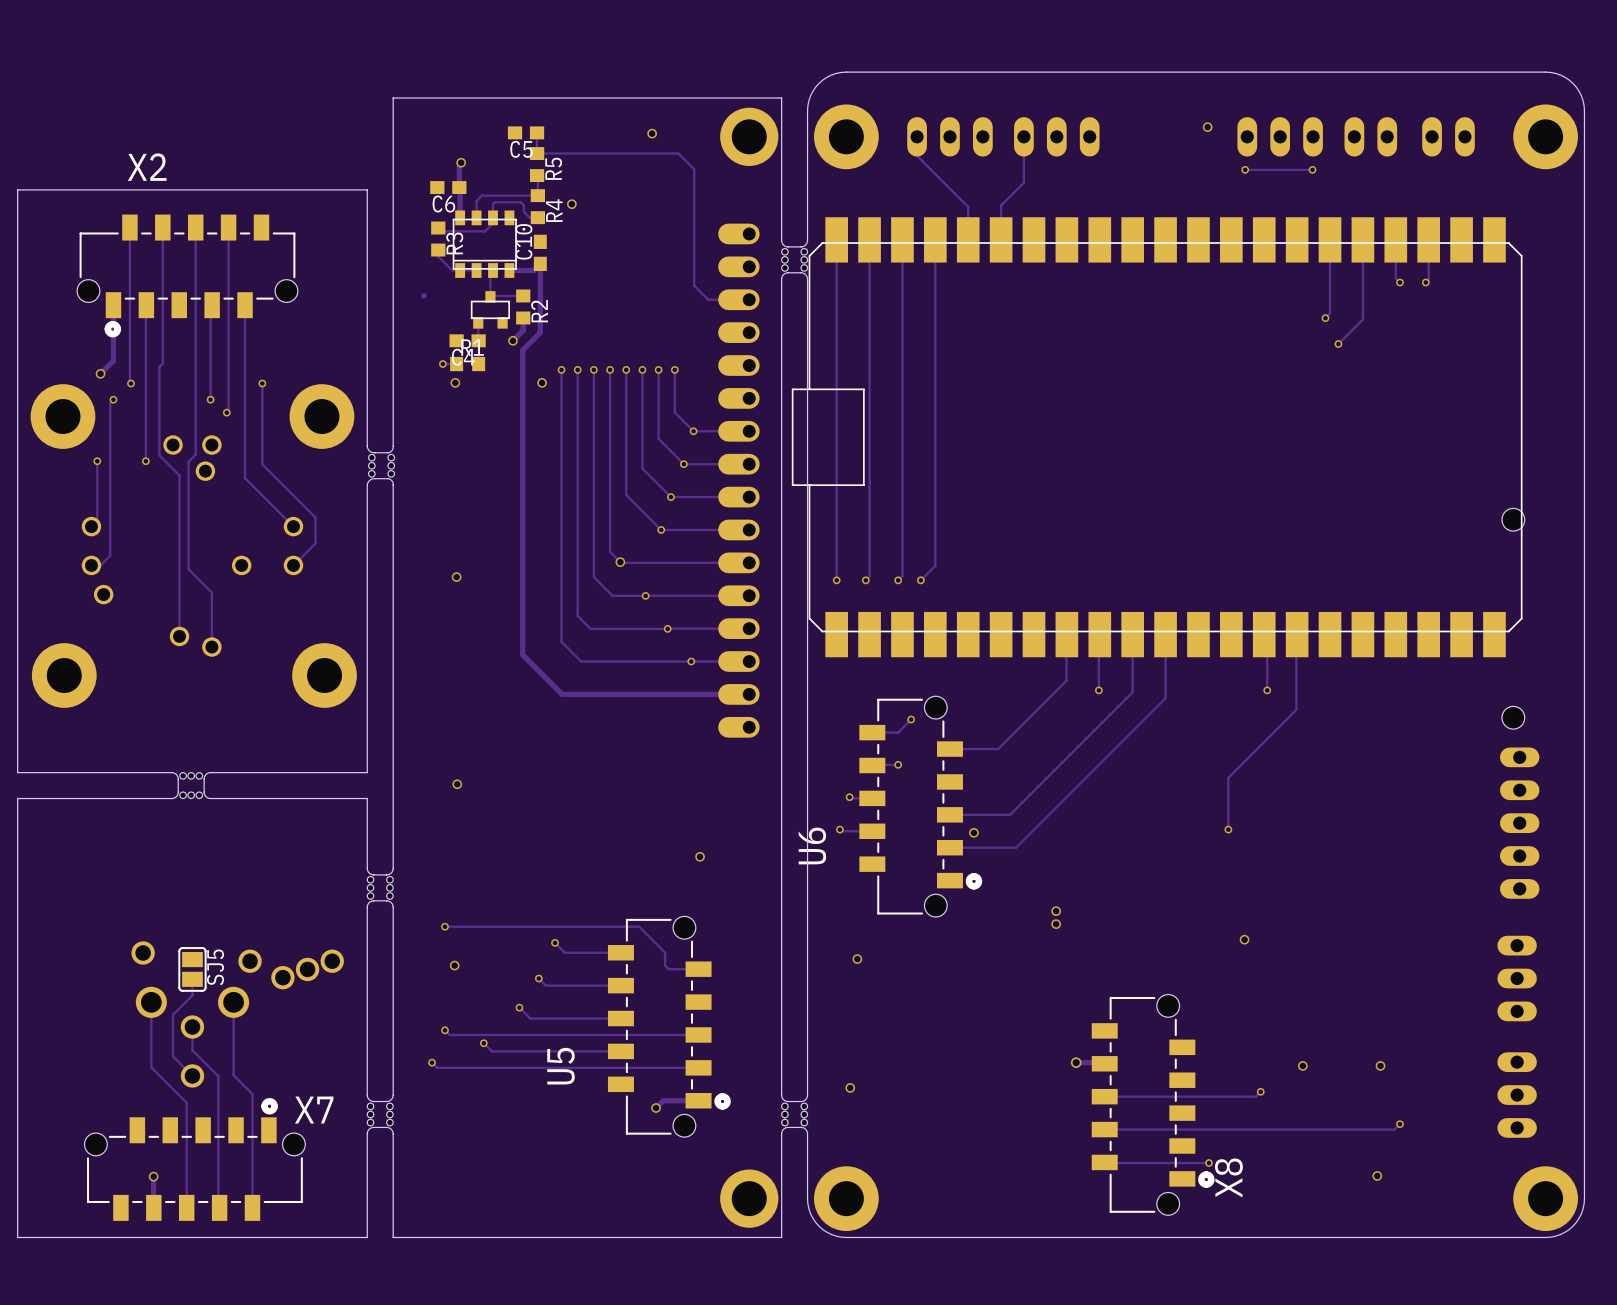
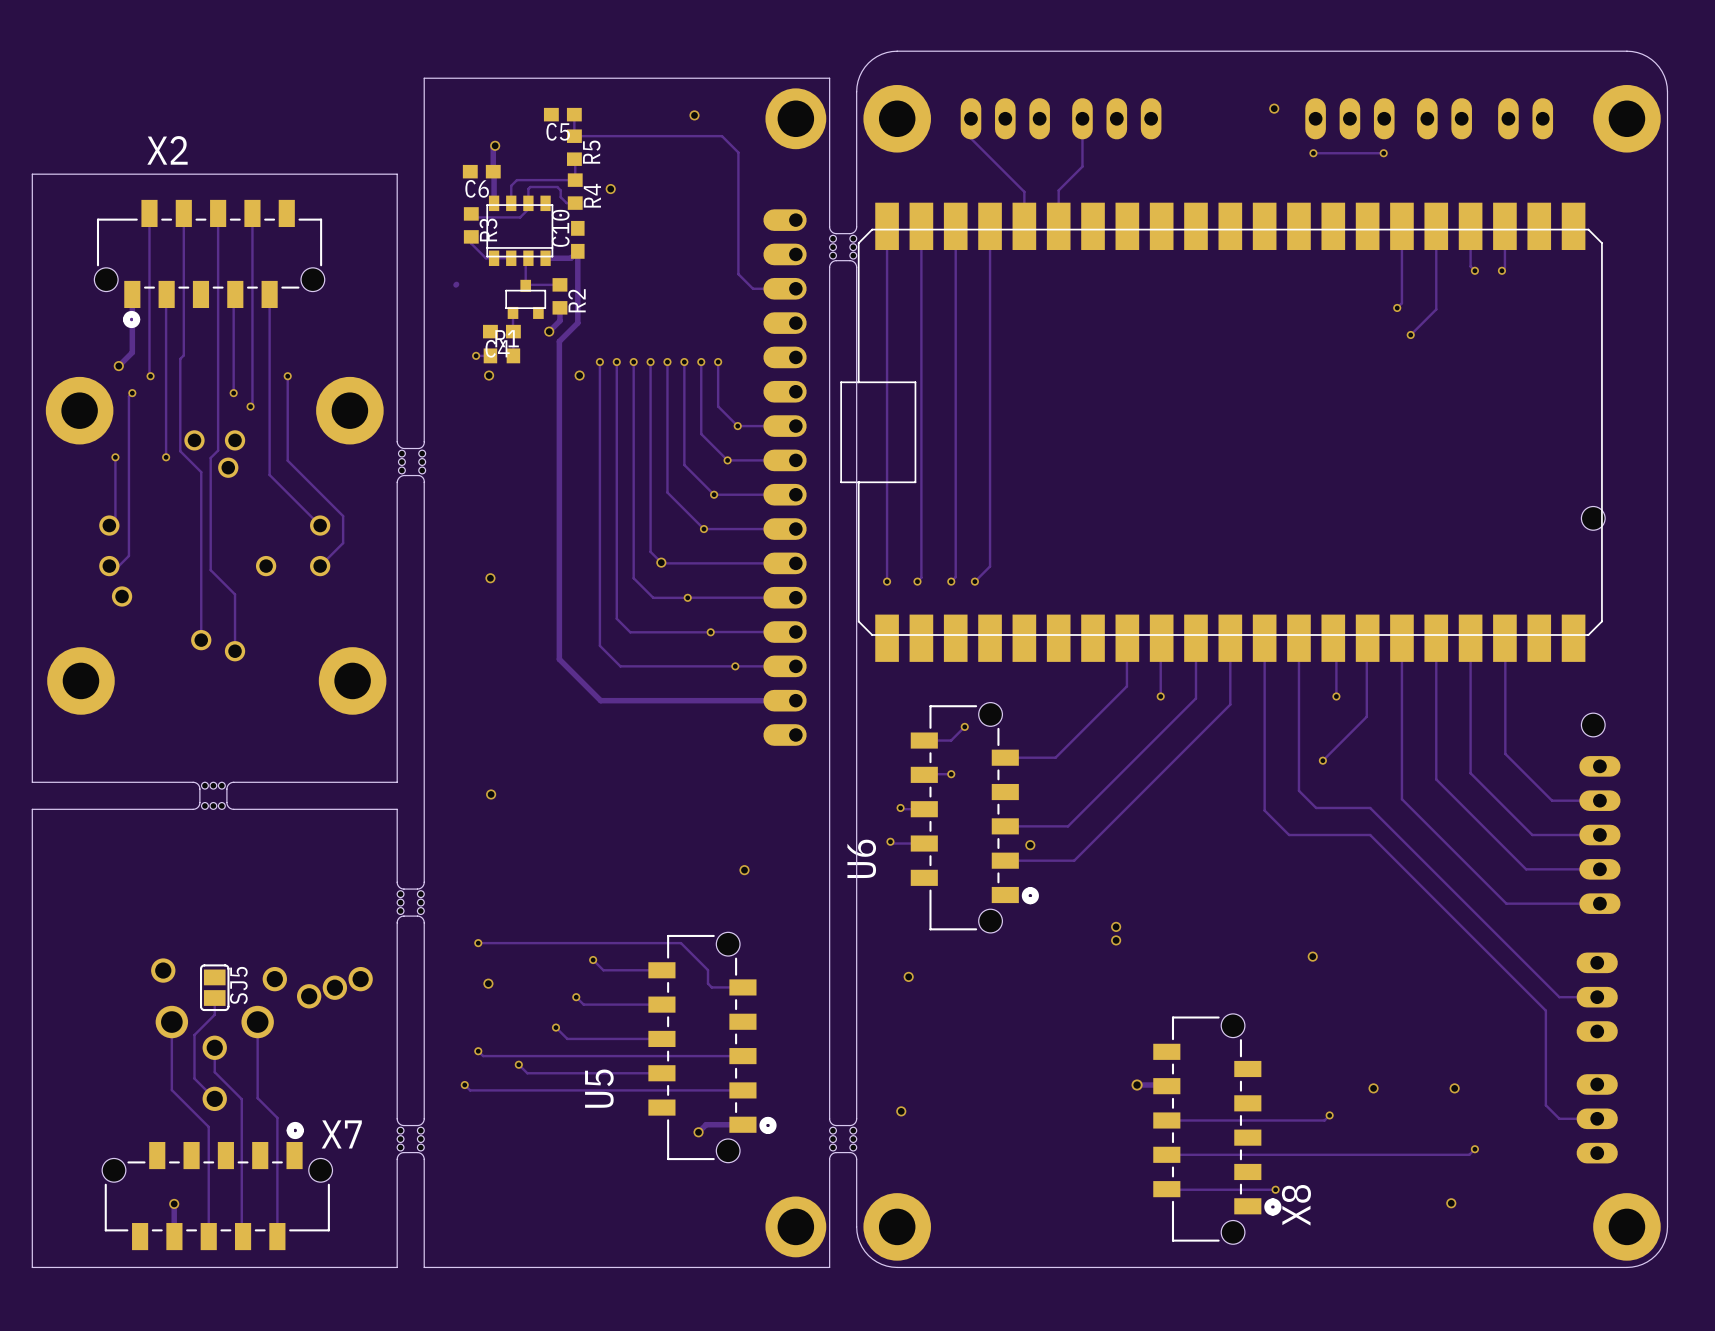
track: none -> (1264, 638) (1264, 810) (1289, 835) (1370, 835) (1545, 1010) (1545, 1105) (1559, 1118) (1597, 1118)
track: none -> (1298, 638) (1298, 790) (1316, 807) (1370, 807) (1559, 997) (1597, 997)
track: none -> (1401, 638) (1401, 799) (1506, 903) (1599, 903)
track: none -> (1436, 638) (1436, 779) (1526, 869) (1599, 869)
track: none -> (1470, 638) (1470, 773) (1532, 835) (1599, 835)
track: none -> (1504, 638) (1505, 753) (1552, 800) (1599, 800)
track: (1254, 751) (1228, 777) (1228, 829) -> none
via: none -> (1322, 760)
via: (1228, 829) -> none

